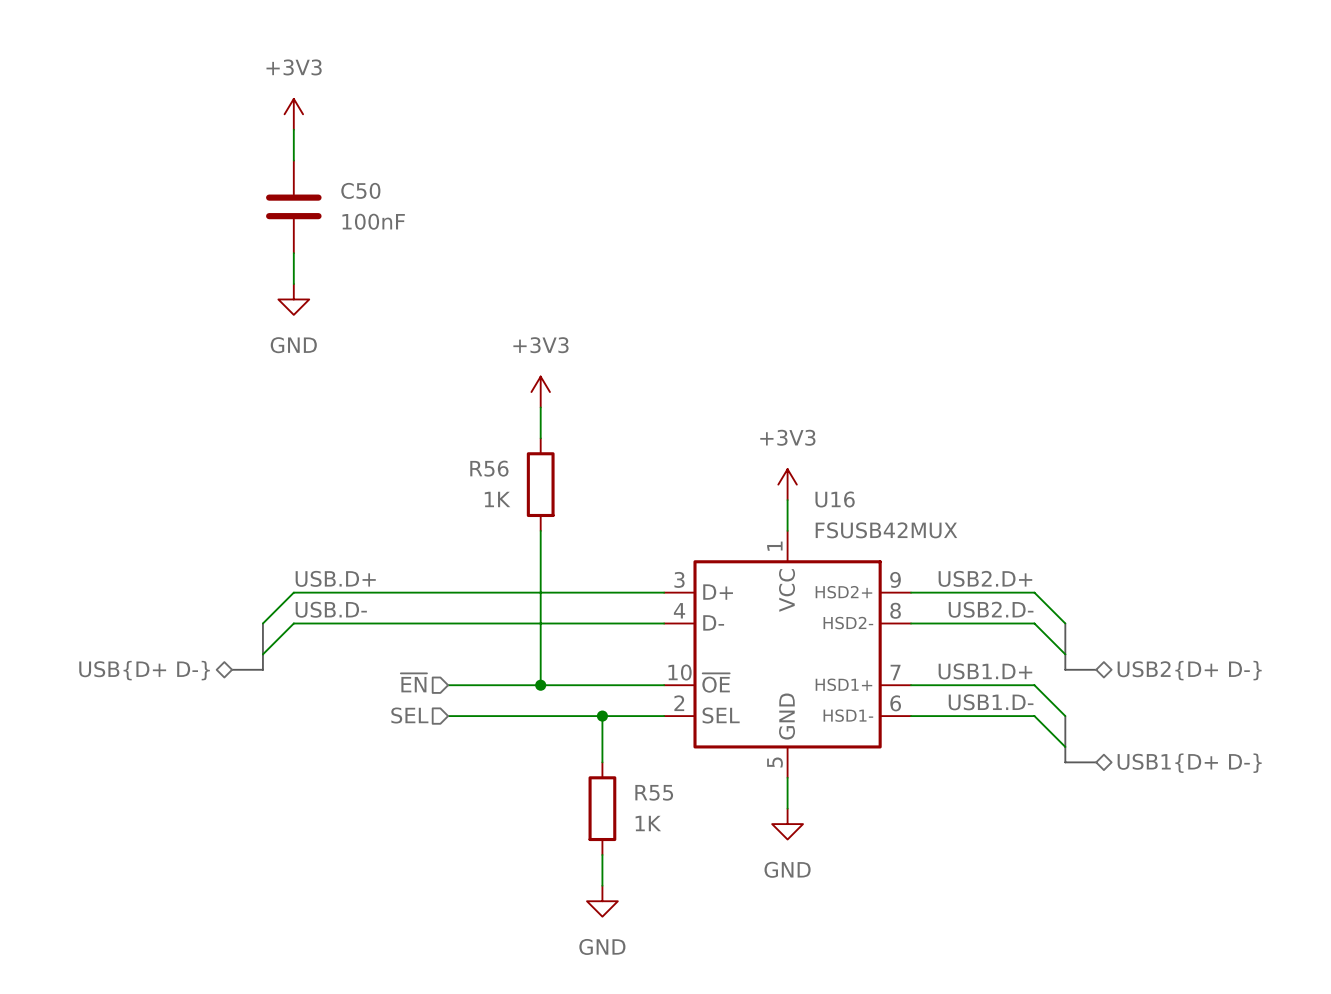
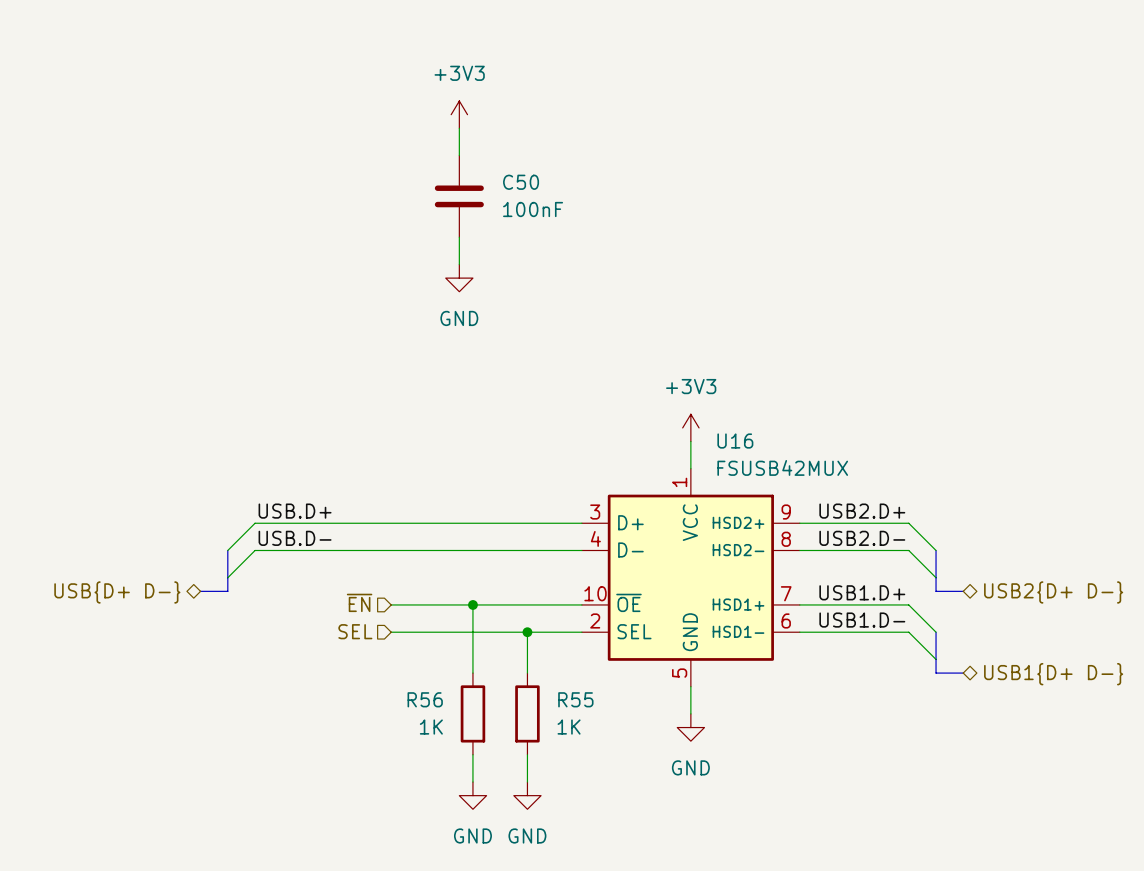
power symbol: +3V3 (293, 114) -> none
wire: (293, 129) (293, 160) -> (459, 128) (459, 155)
power symbol: none -> +3V3 (459, 114)
C50 position: (293, 206) -> (459, 196)
wire: (293, 253) (293, 284) -> none
power symbol position: GND (293, 299) -> GND (459, 278)
power symbol: +3V3 (540, 392) -> none
wire: (540, 407) (540, 438) -> (459, 237) (459, 264)
R56 position: (540, 484) -> (472, 713)
wire: (540, 530) (540, 685) -> (472, 673) (472, 604)
wire: none -> (472, 754) (472, 782)
power symbol: none -> GND (472, 795)

